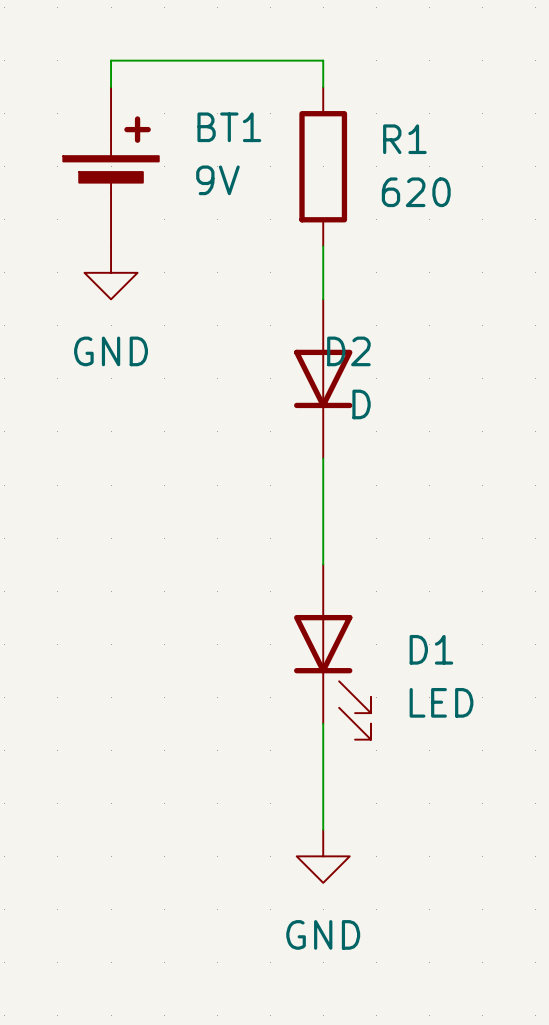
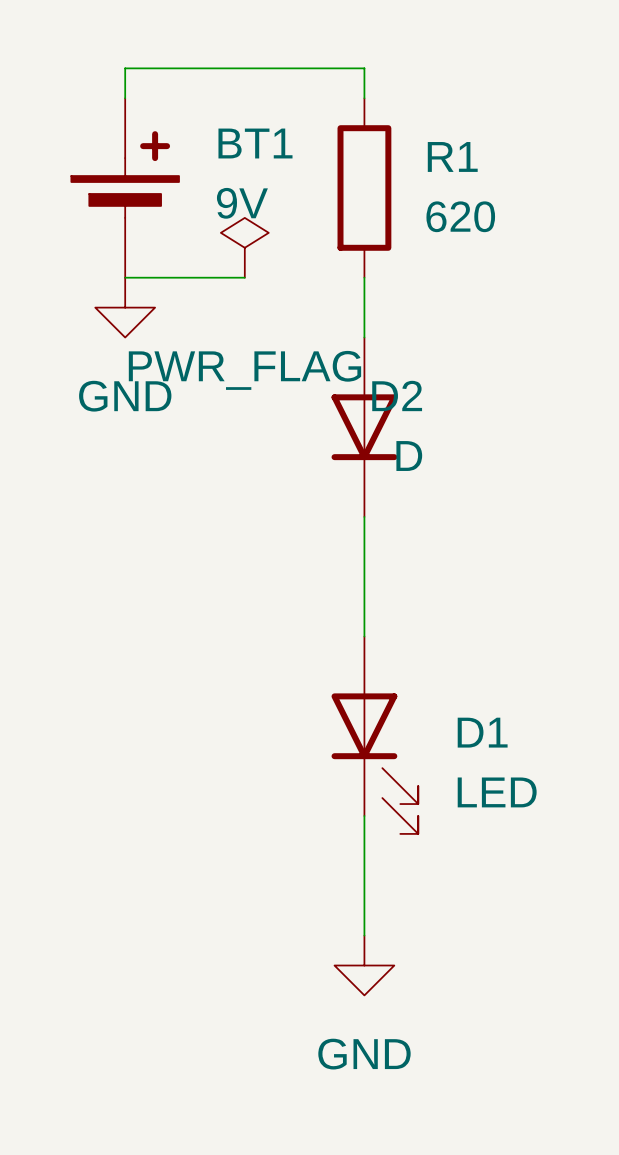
power symbol: none -> PWR_FLAG (244, 247)
wire: none -> (125, 277) (244, 277)

